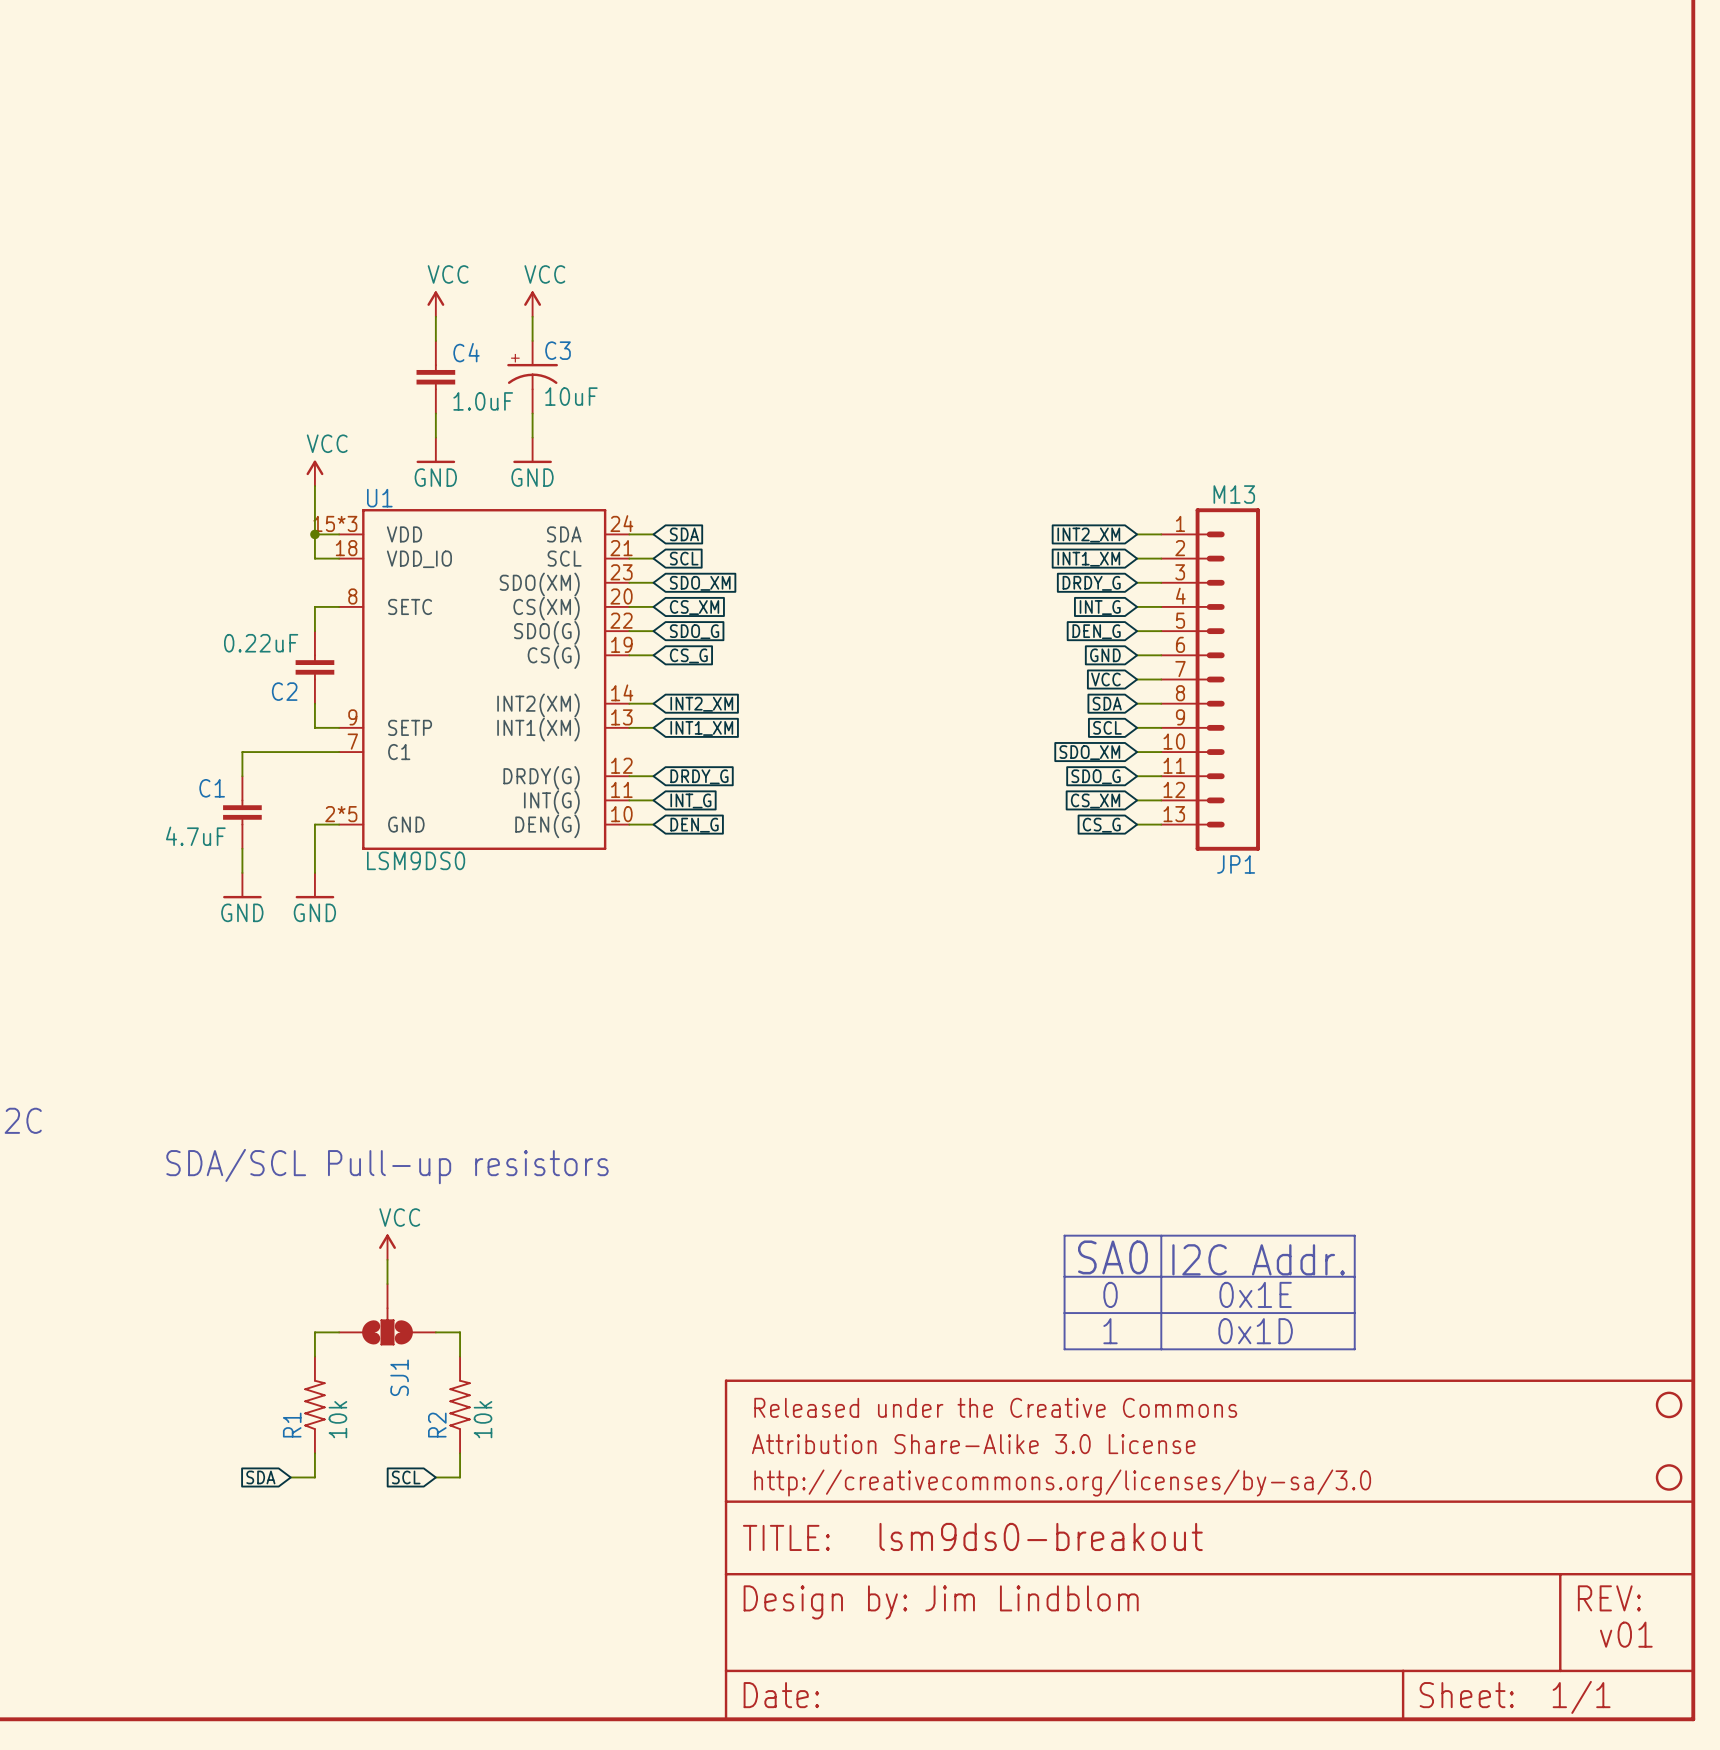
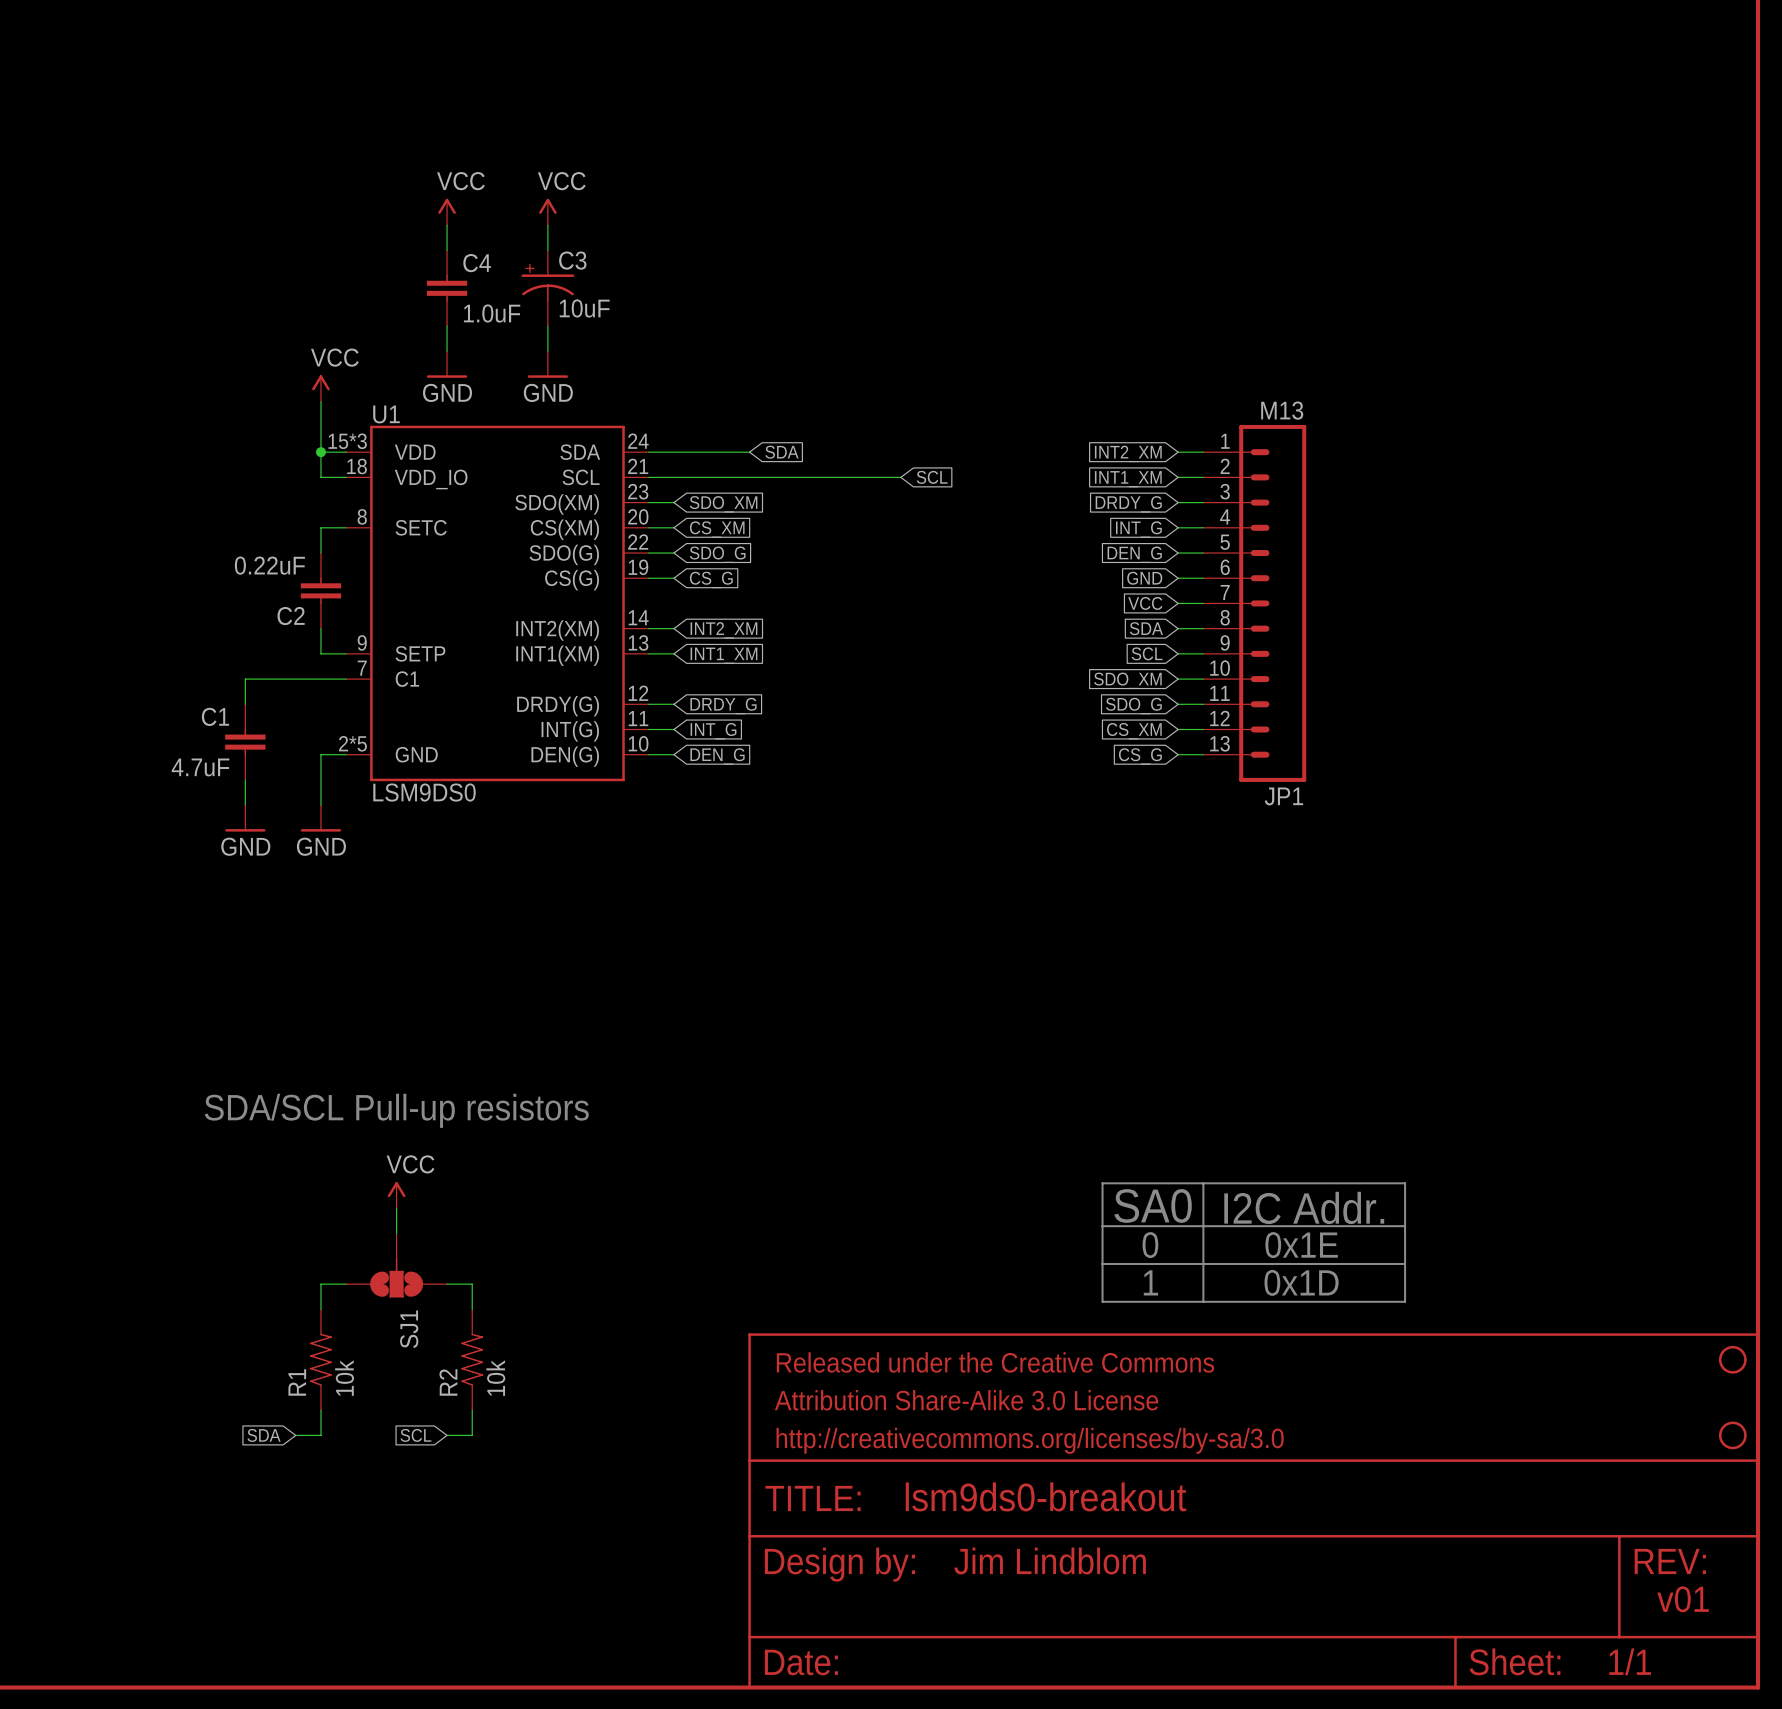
wire: none -> (673, 452) (749, 452)
global label position: SDA (684, 534) -> SDA (782, 452)
wire: none -> (673, 477) (900, 477)
global label position: SCL (684, 558) -> SCL (932, 477)

